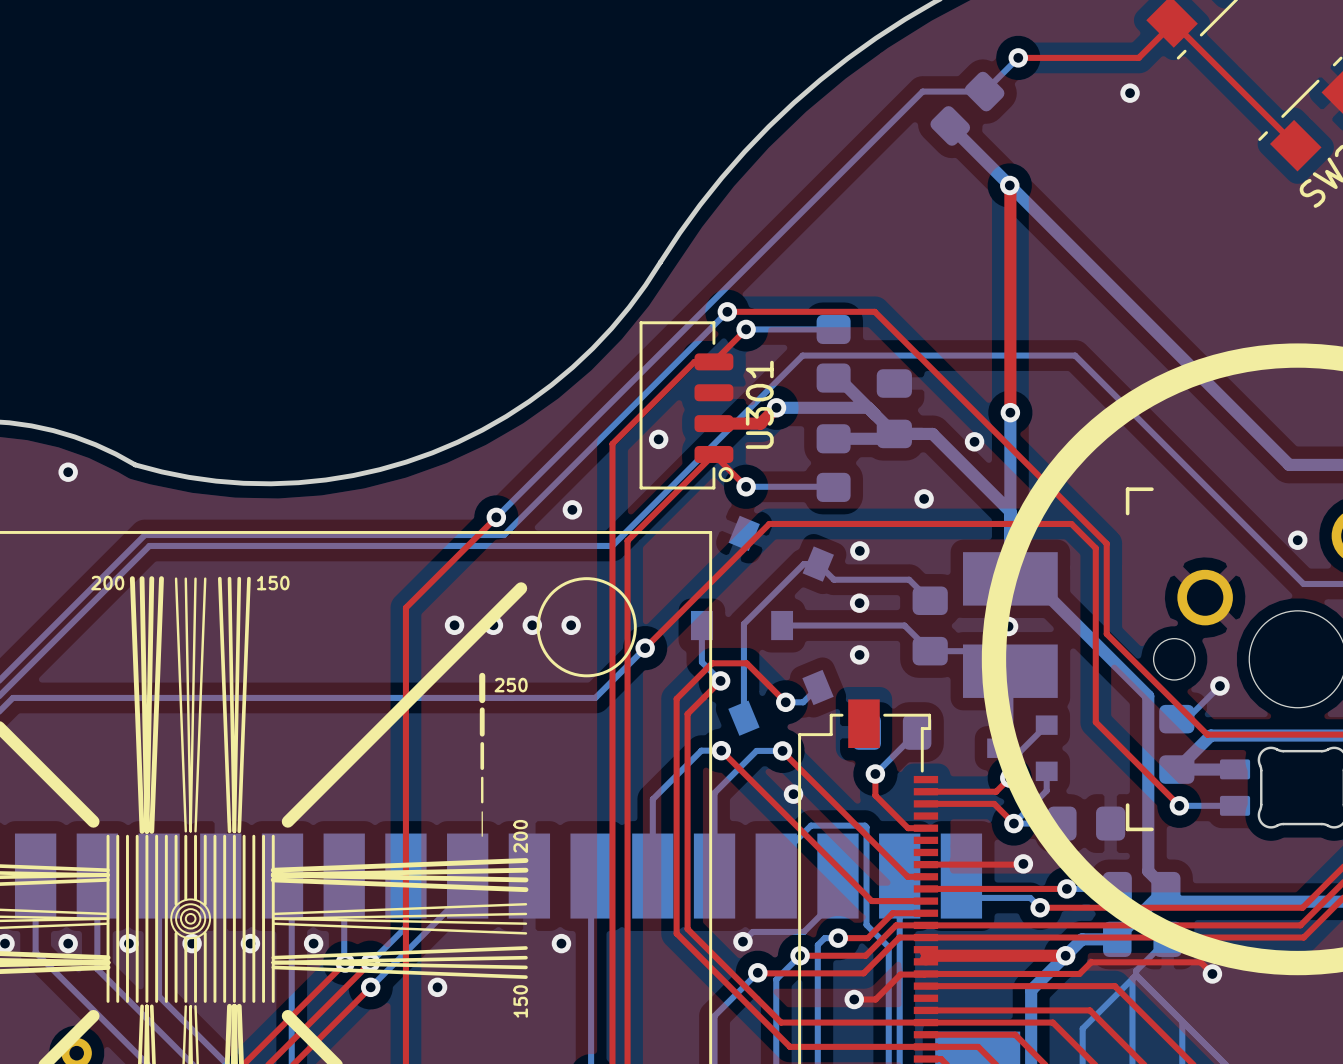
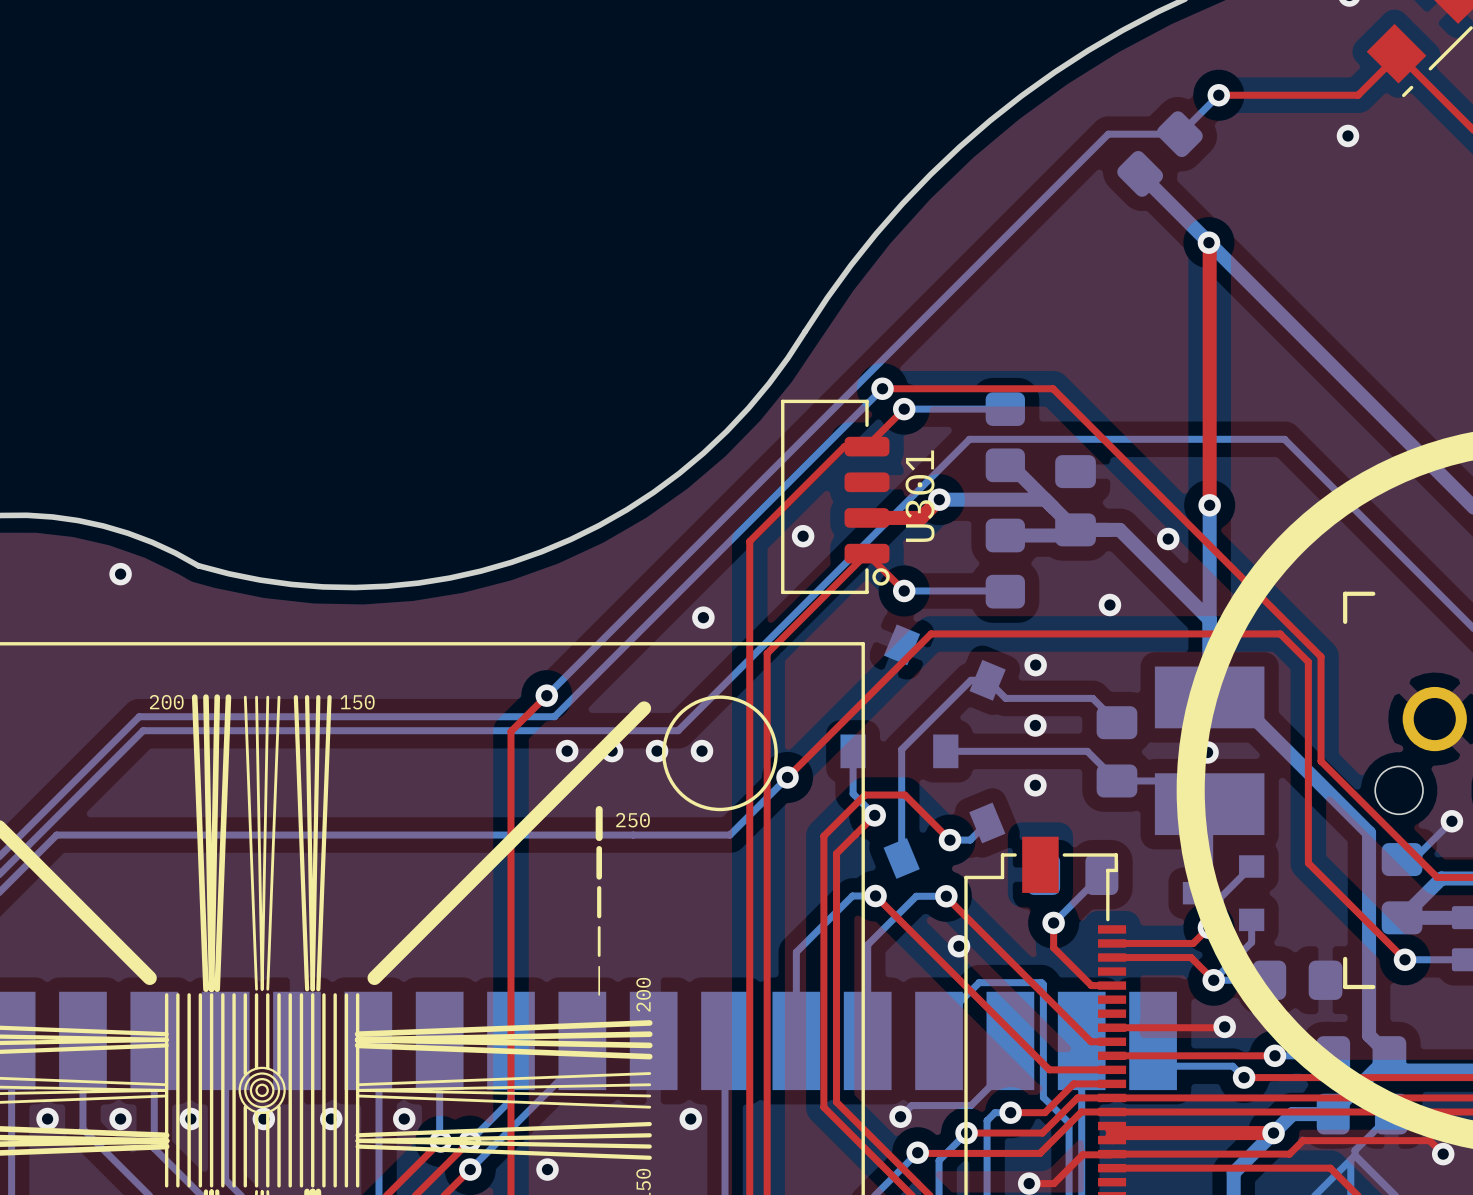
bottom track: (922, 91) (496, 517) -> (1108, 134) (546, 695)
top track: (496, 517) (405, 608) -> (546, 695) (511, 731)
via position: (496, 517) -> (546, 695)
bottom track: (504, 535) (144, 535) (84, 595) -> (624, 646) (554, 716) (139, 716)
bottom track: (612, 545) (149, 545) (87, 607) -> (749, 659) (678, 730) (143, 730)

